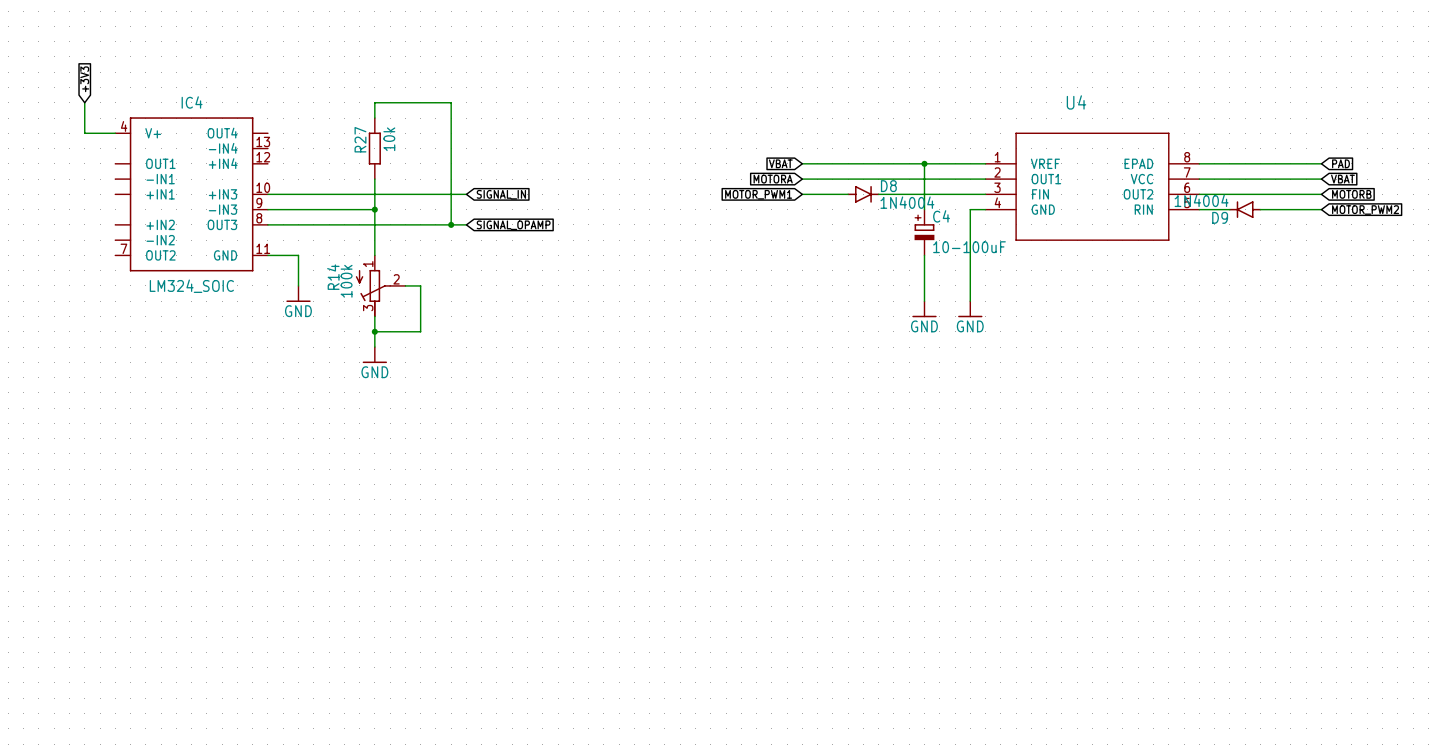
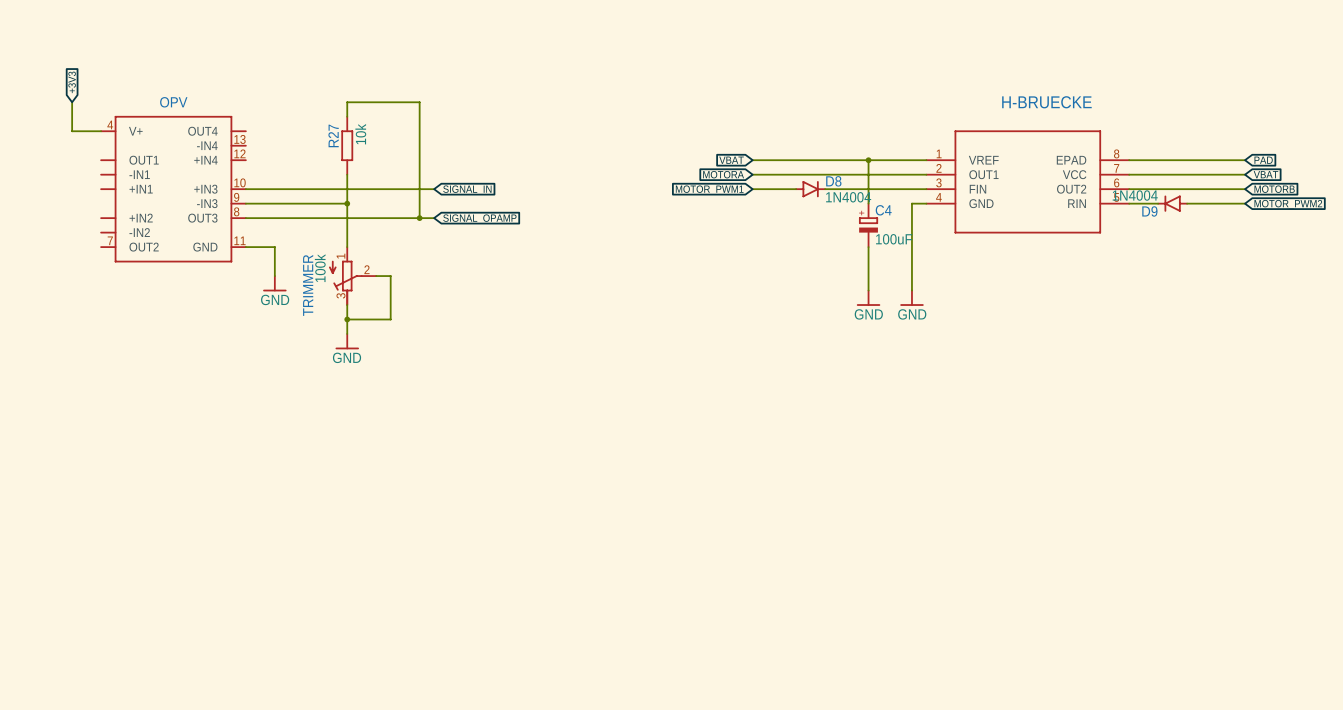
IC4 name: IC4 (192, 102) -> OPV (173, 102)
U4 name: U4 (1076, 102) -> H-BRUECKE (1046, 102)
C4 value: 10-100uF (969, 247) -> 100uF (894, 239)
R14 name: R14 (333, 277) -> TRIMMER (308, 285)
IC4 value: LM324_SOIC (191, 286) -> none

